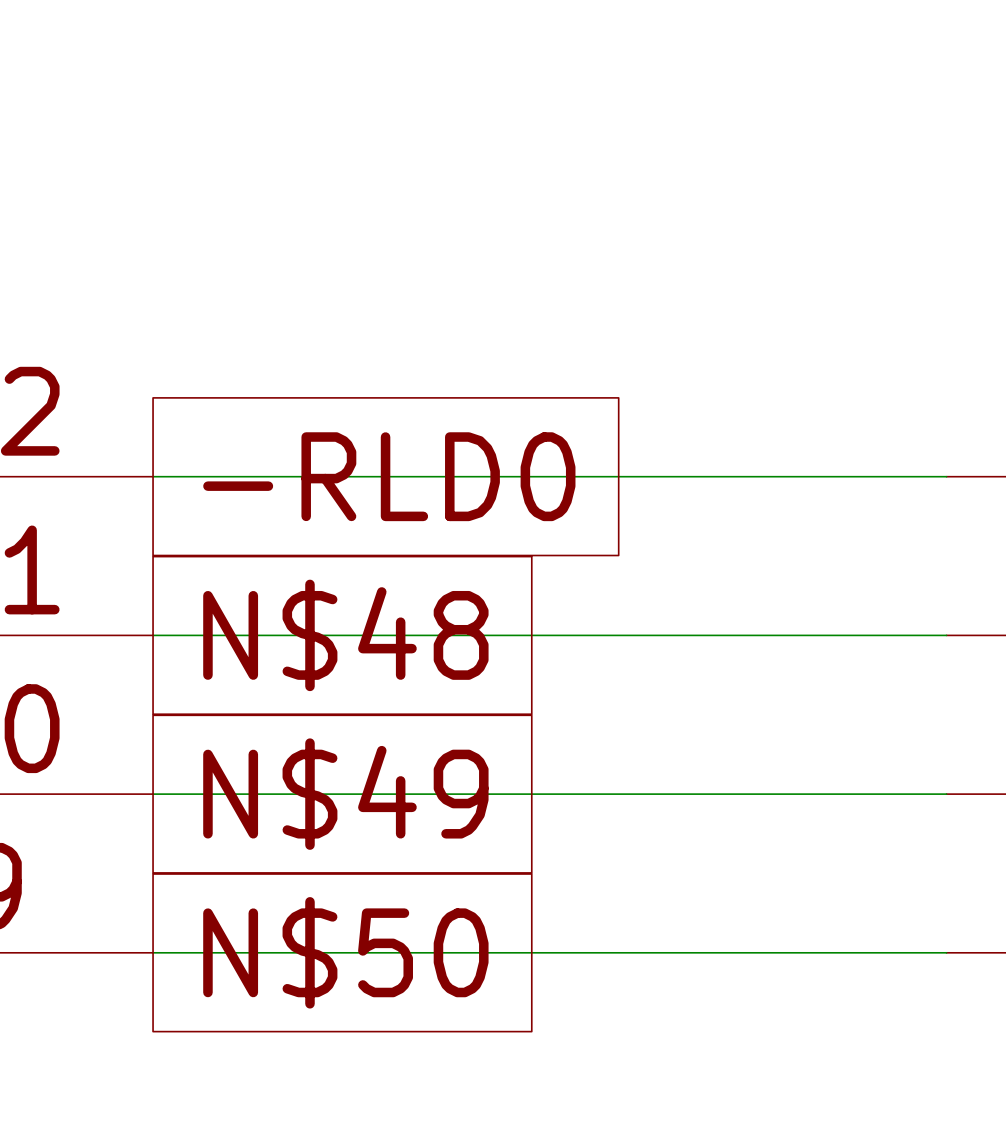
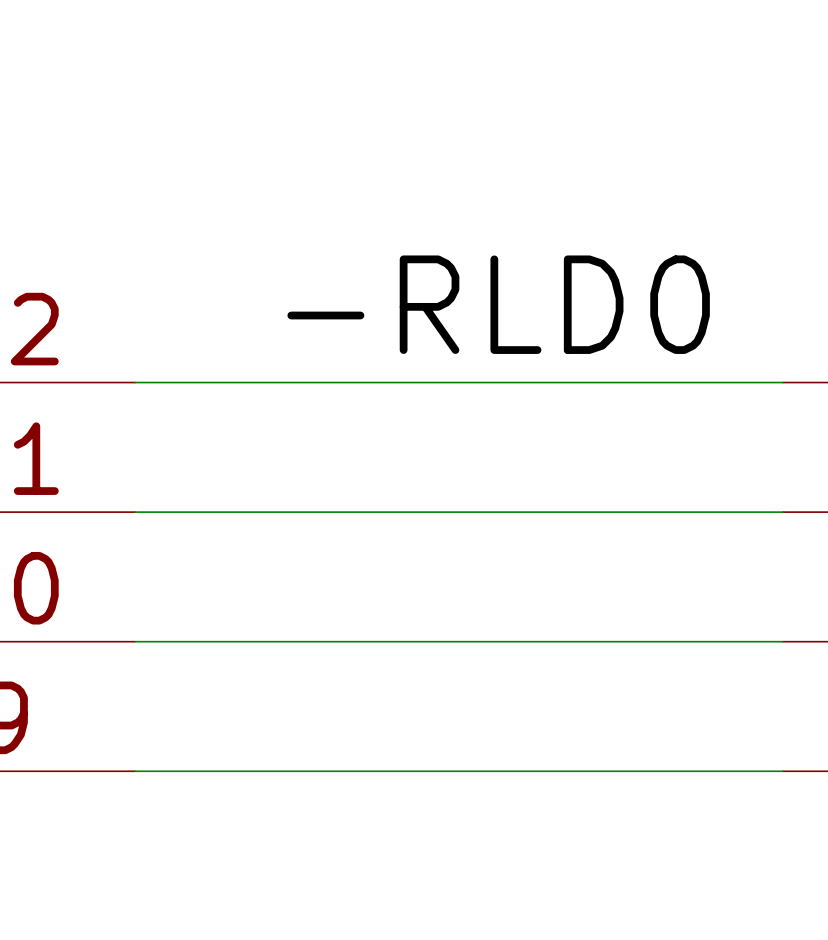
label: none -> -RLD0 (498, 304)
global label: -RLD0 (389, 476) -> none
global label: N$48 (345, 635) -> none
global label: N$49 (345, 794) -> none
global label: N$50 (345, 952) -> none

